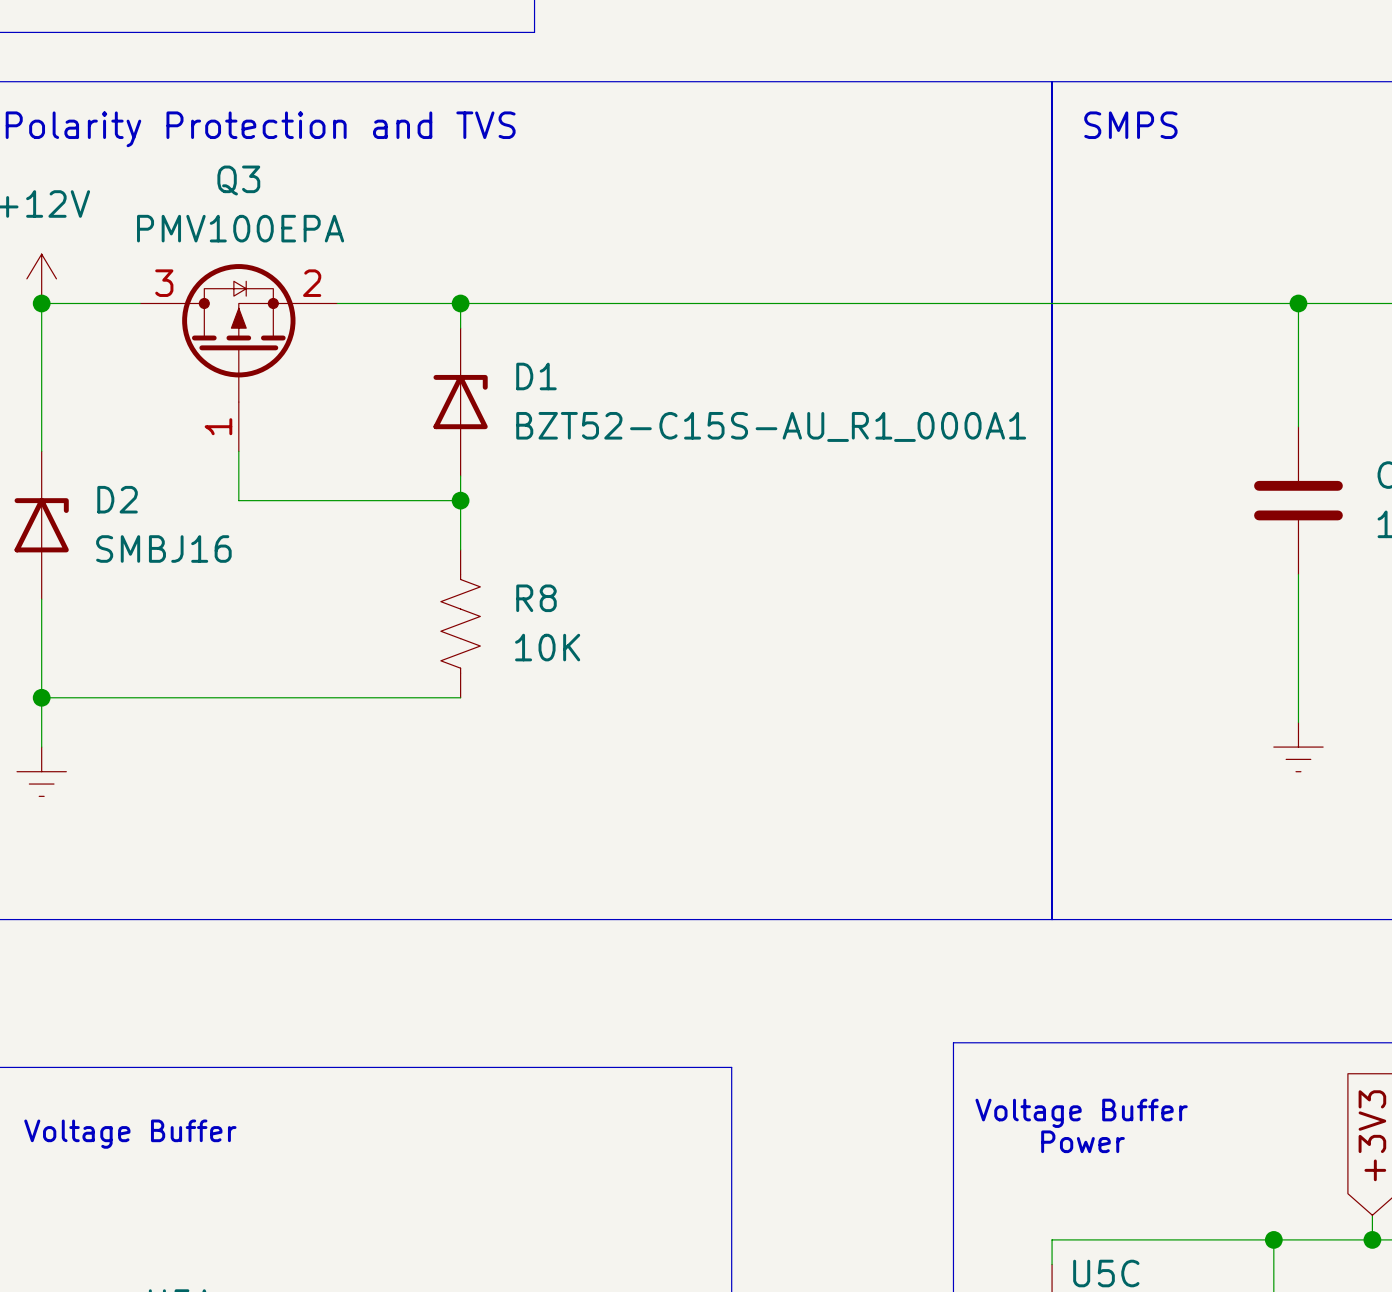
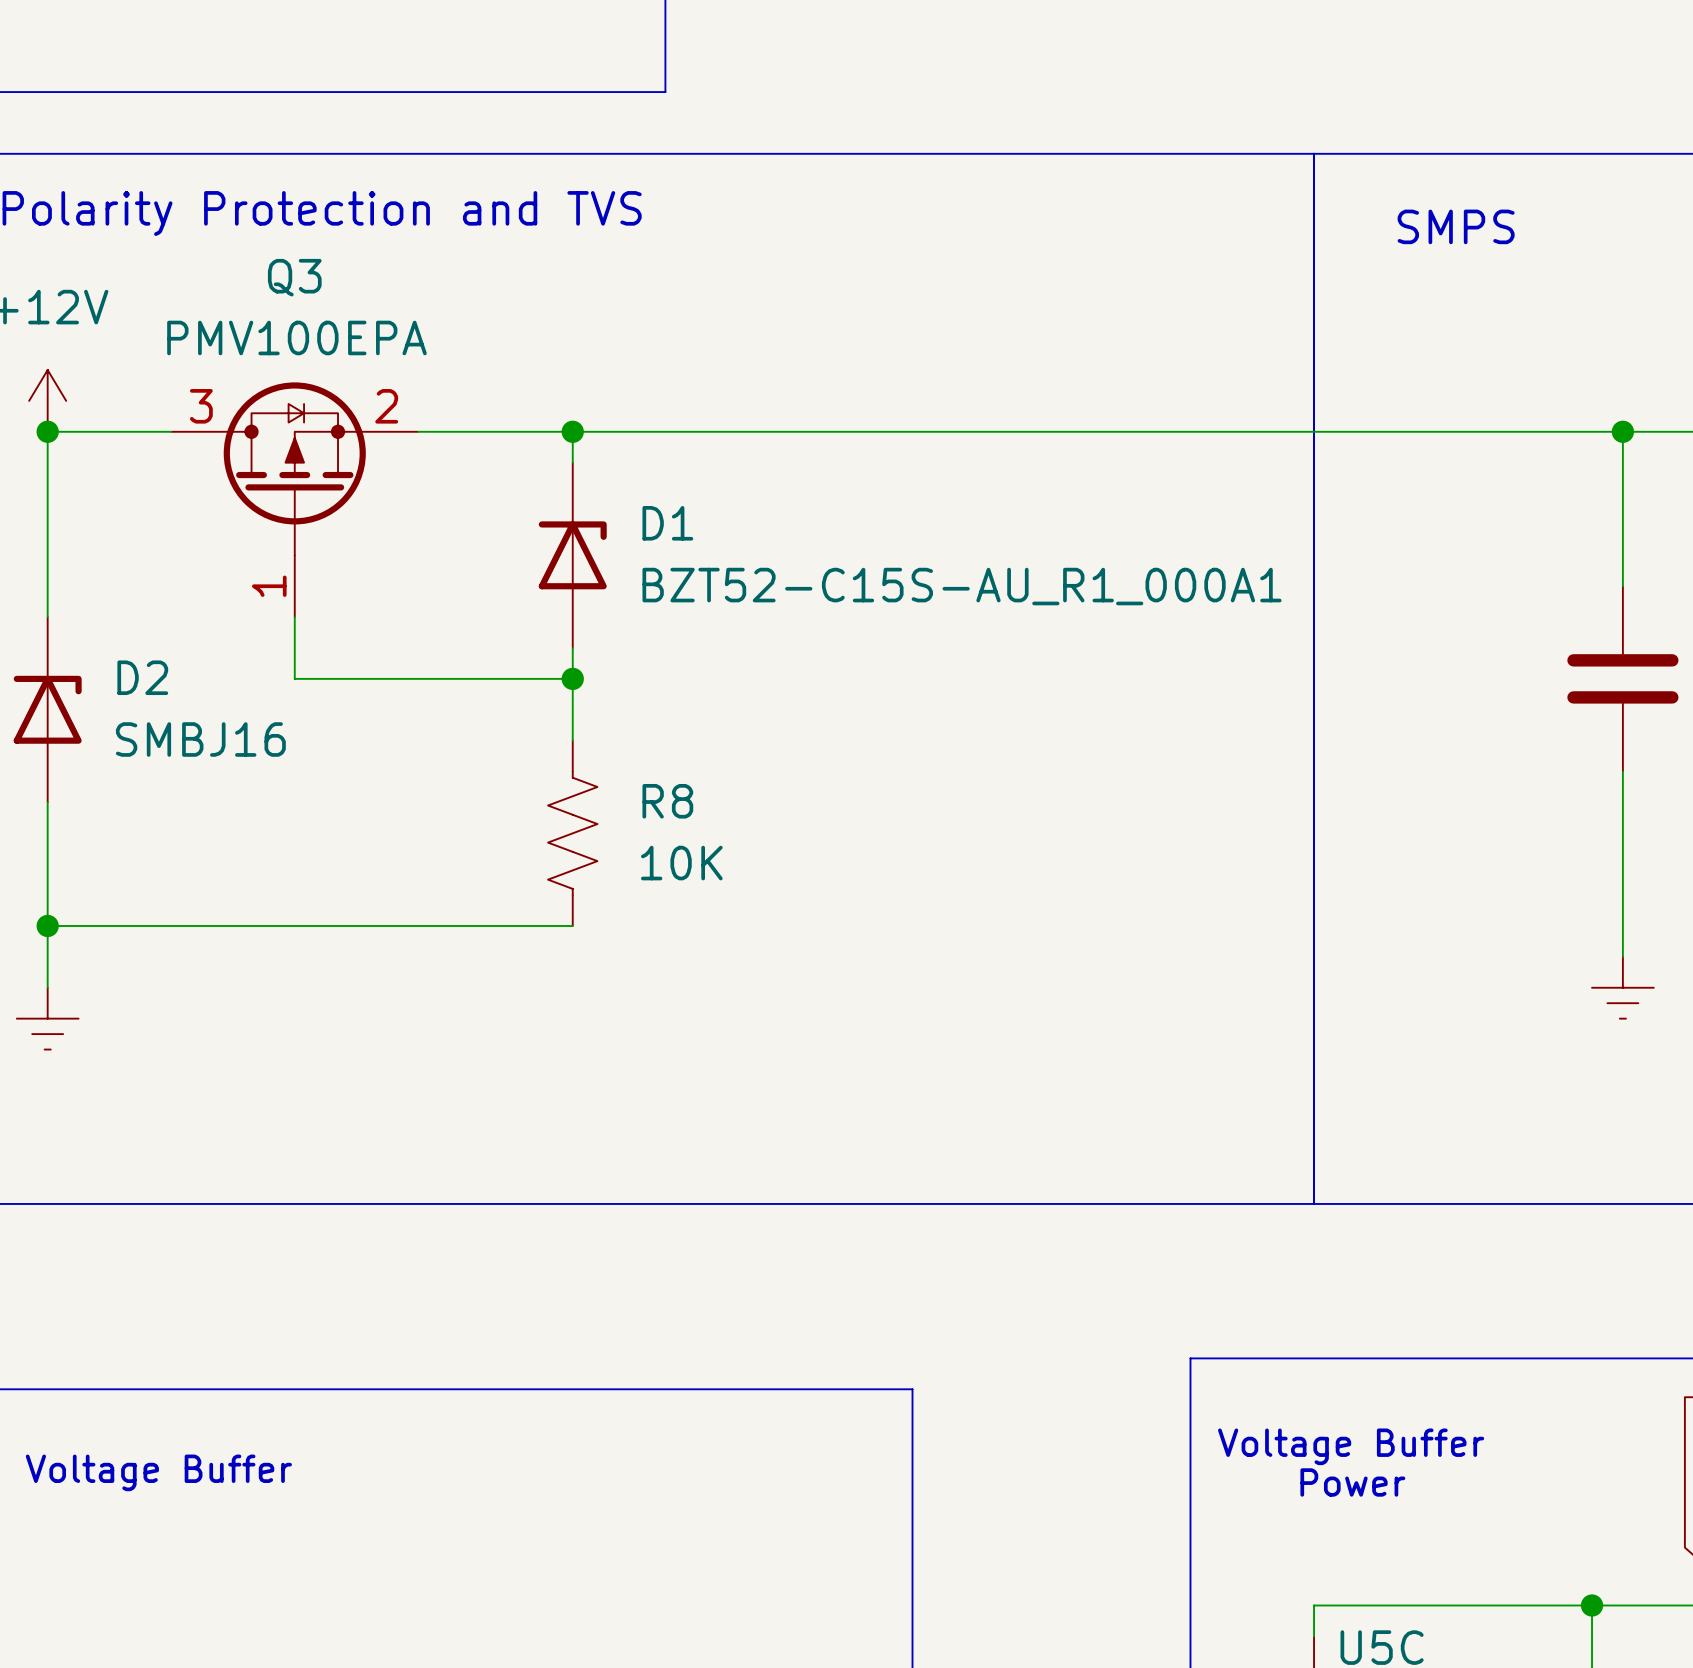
text position: SMPS (1130, 125) -> SMPS (1456, 226)

